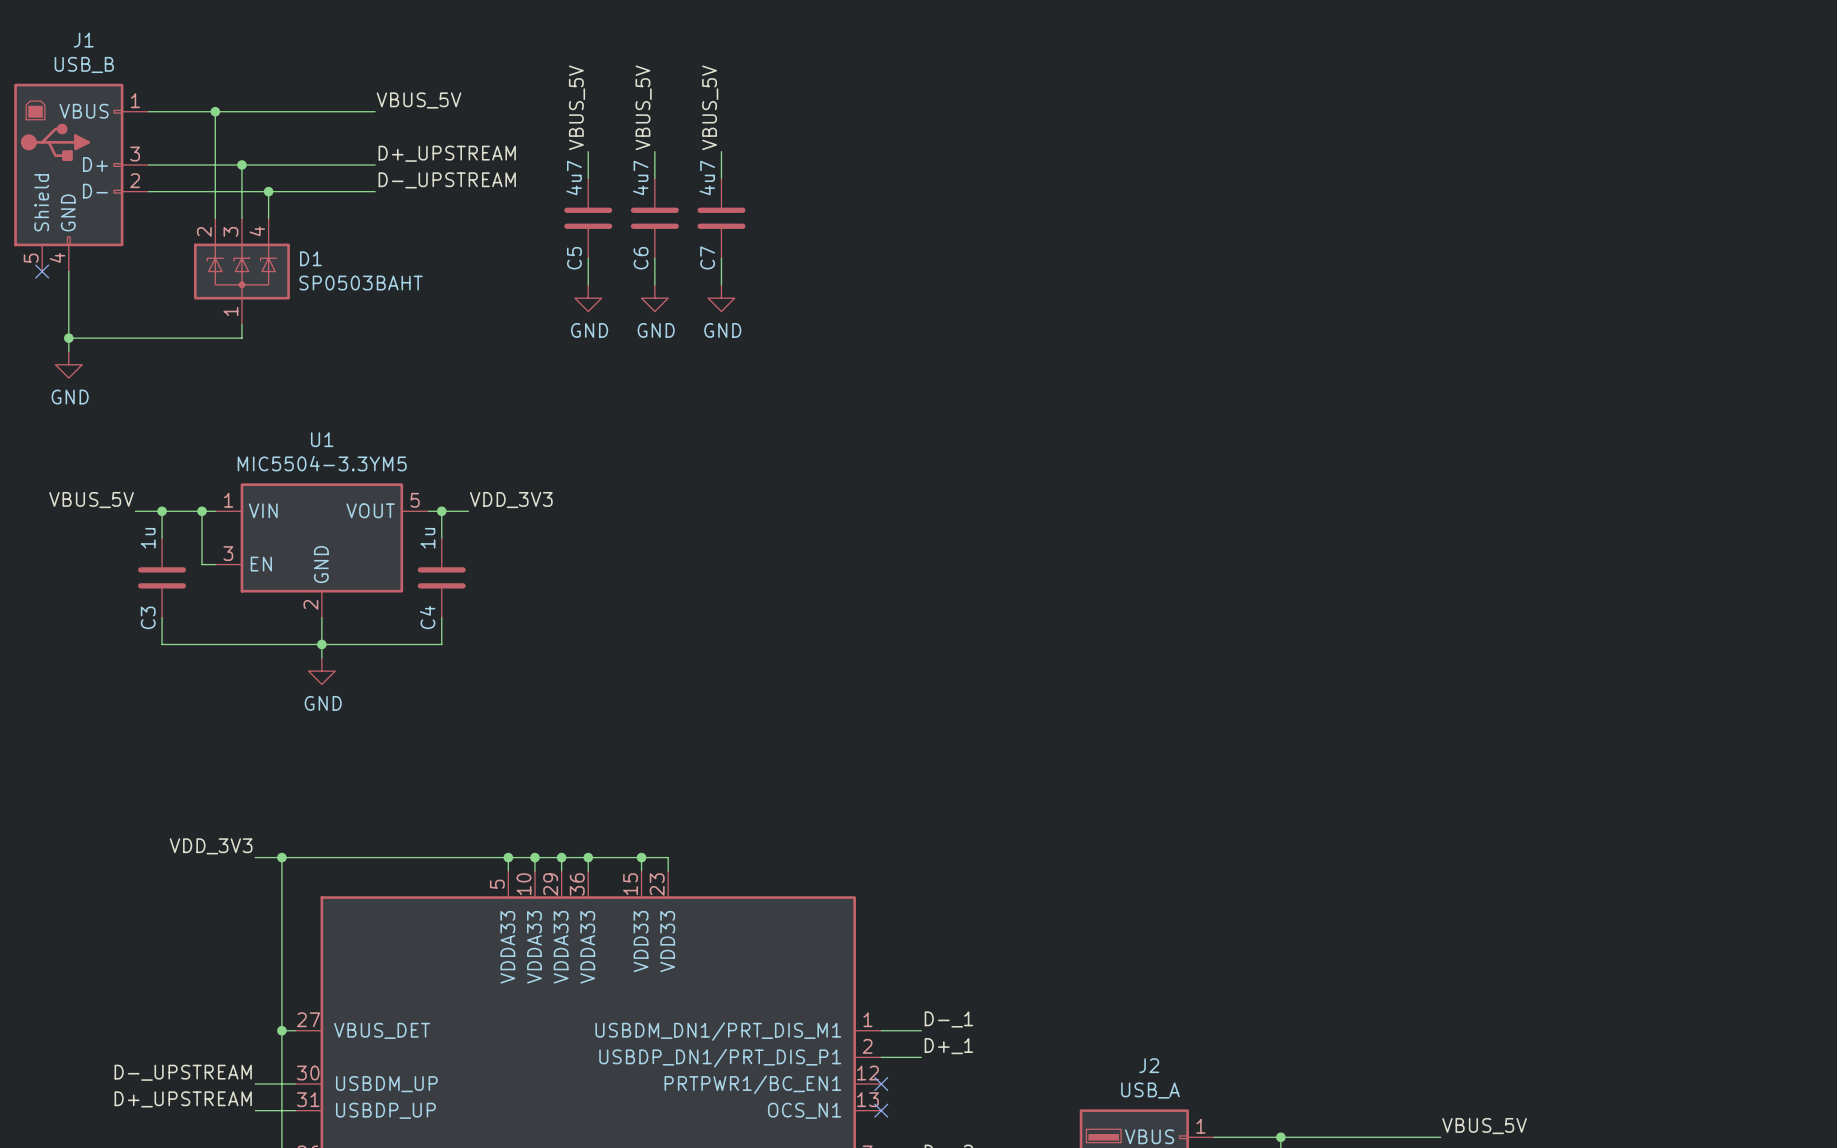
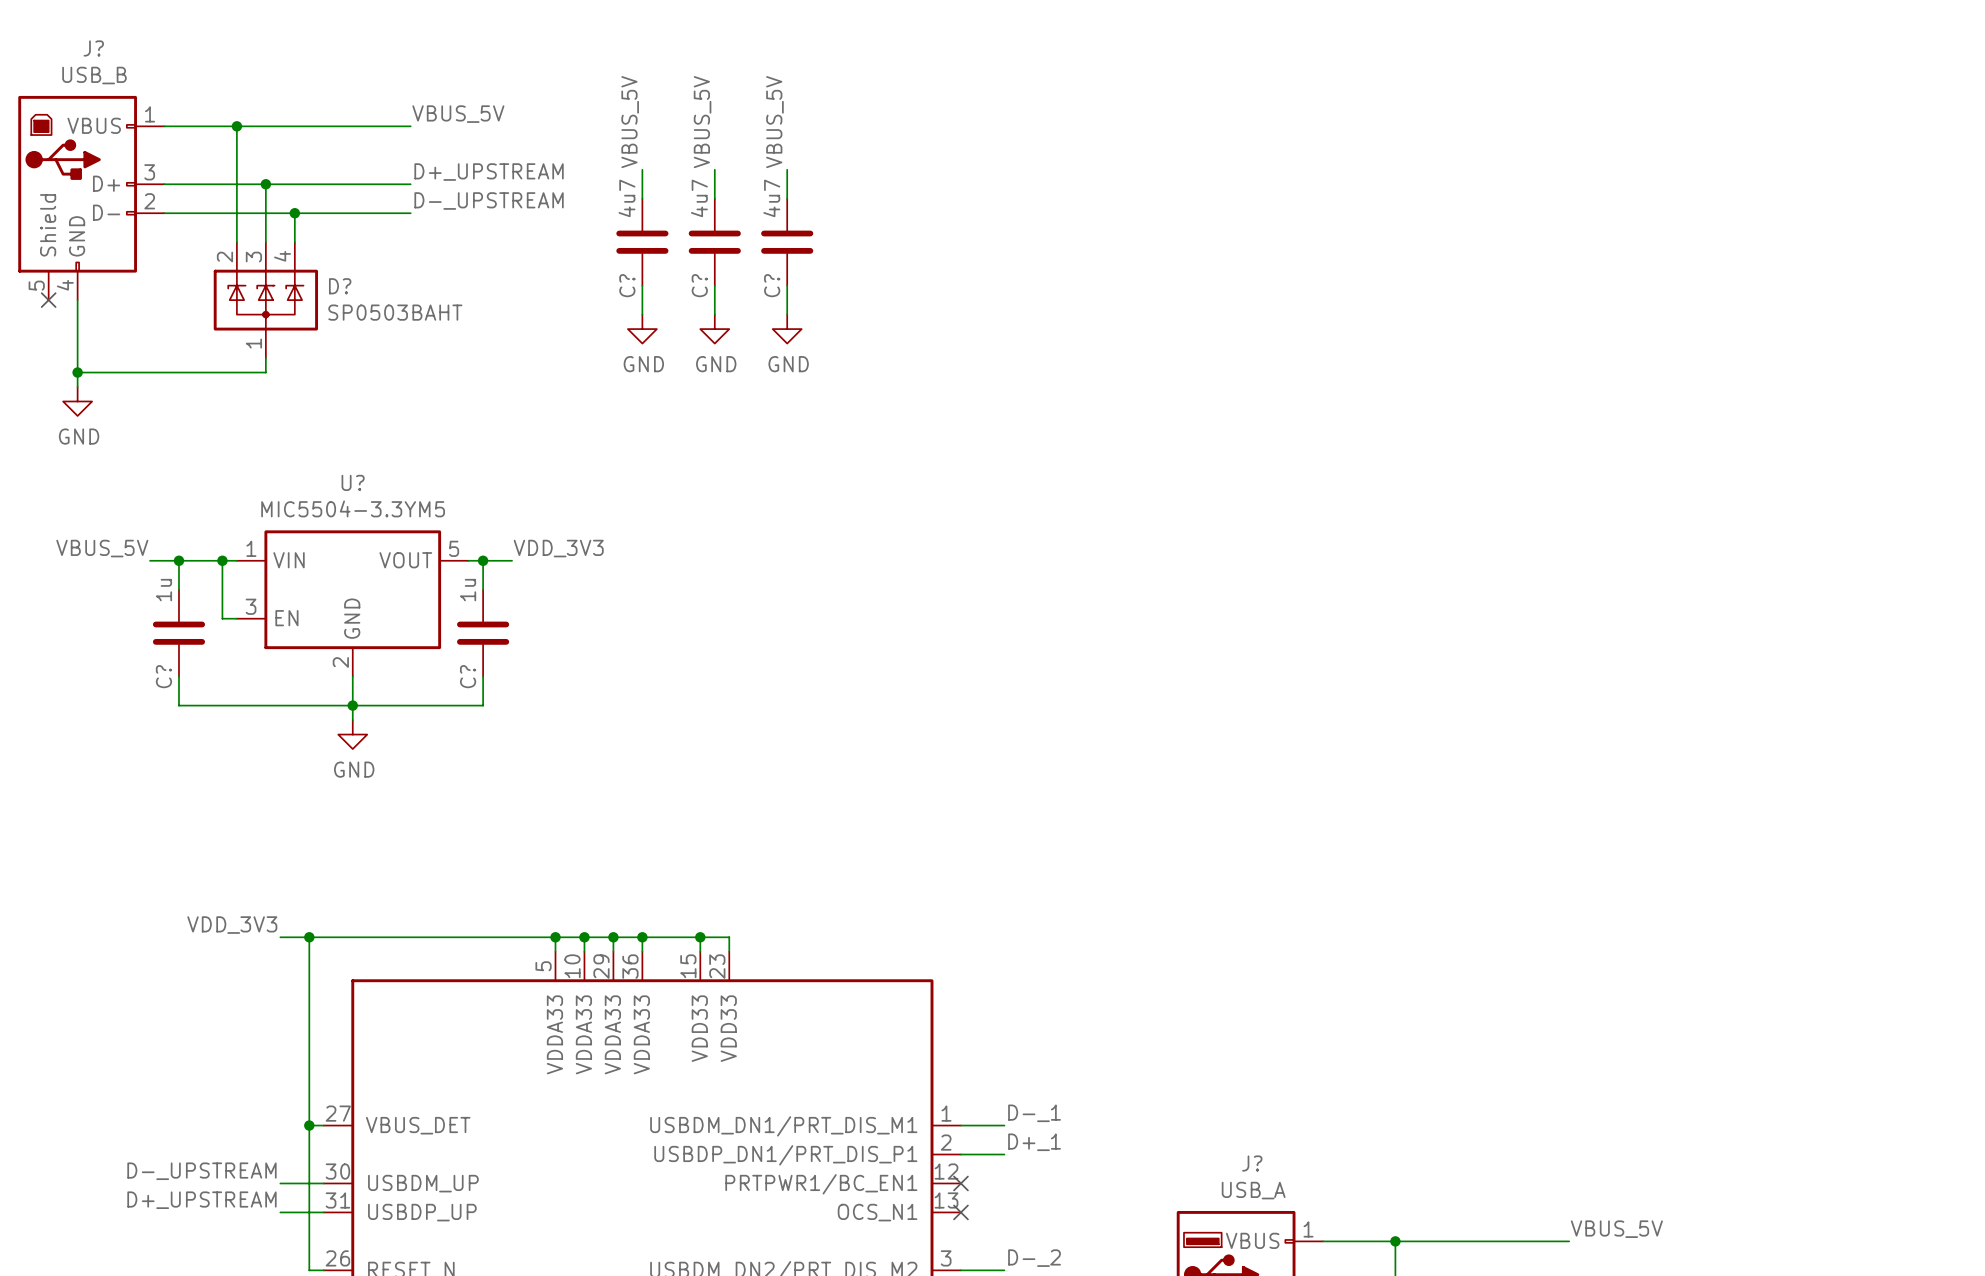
J1 name: J1 (83, 40) -> J? (93, 48)
C7 name: C7 (707, 257) -> C? (772, 285)
D1 name: D1 (310, 258) -> D? (340, 286)
C5 name: C5 (574, 258) -> C? (627, 285)
C6 name: C6 (641, 258) -> C? (699, 285)
U1 name: U1 (322, 439) -> U? (353, 482)
C3 name: C3 (148, 617) -> C? (163, 676)
C4 name: C4 (427, 617) -> C? (468, 676)
J2 name: J2 (1149, 1065) -> J? (1252, 1163)

